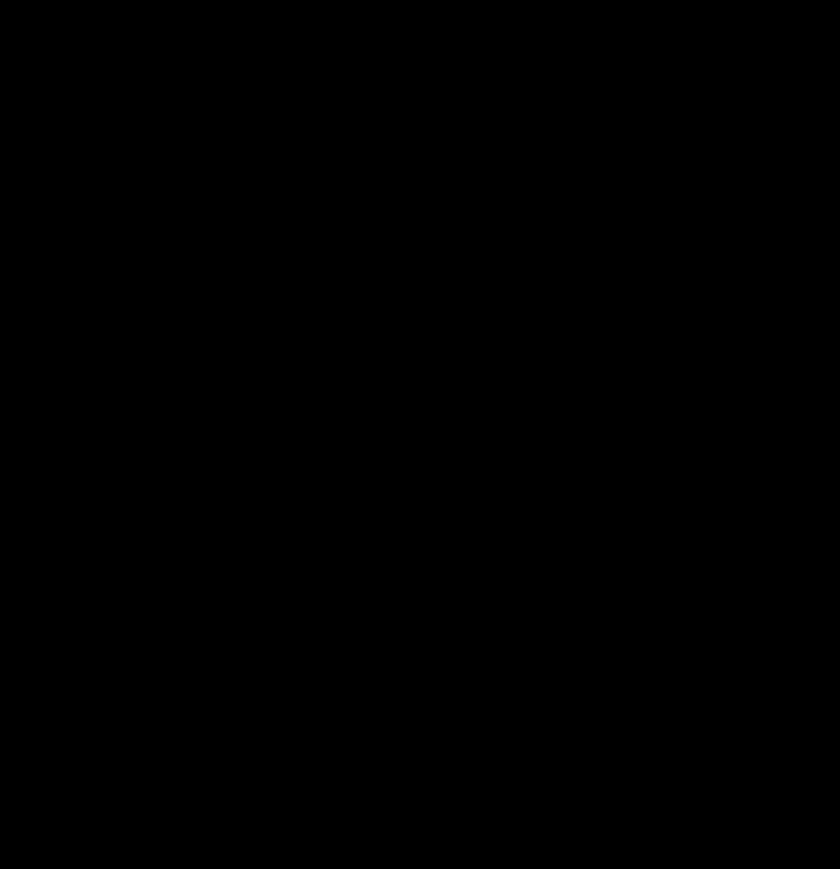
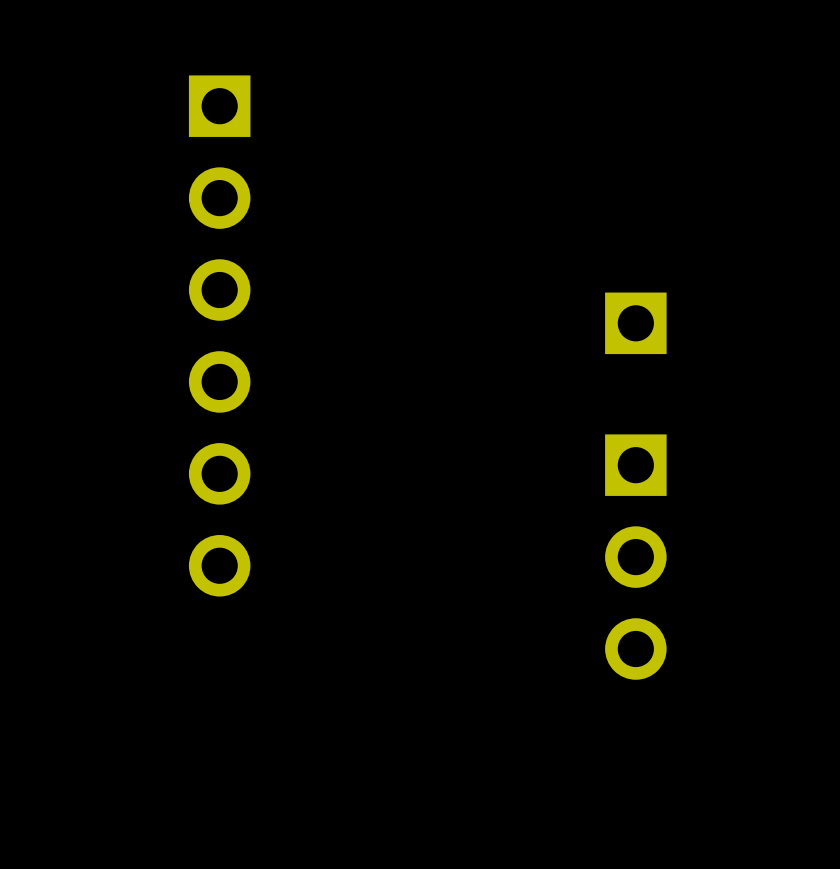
part: none -> (635, 323)
part: none -> (219, 335)
part: none -> (635, 557)

